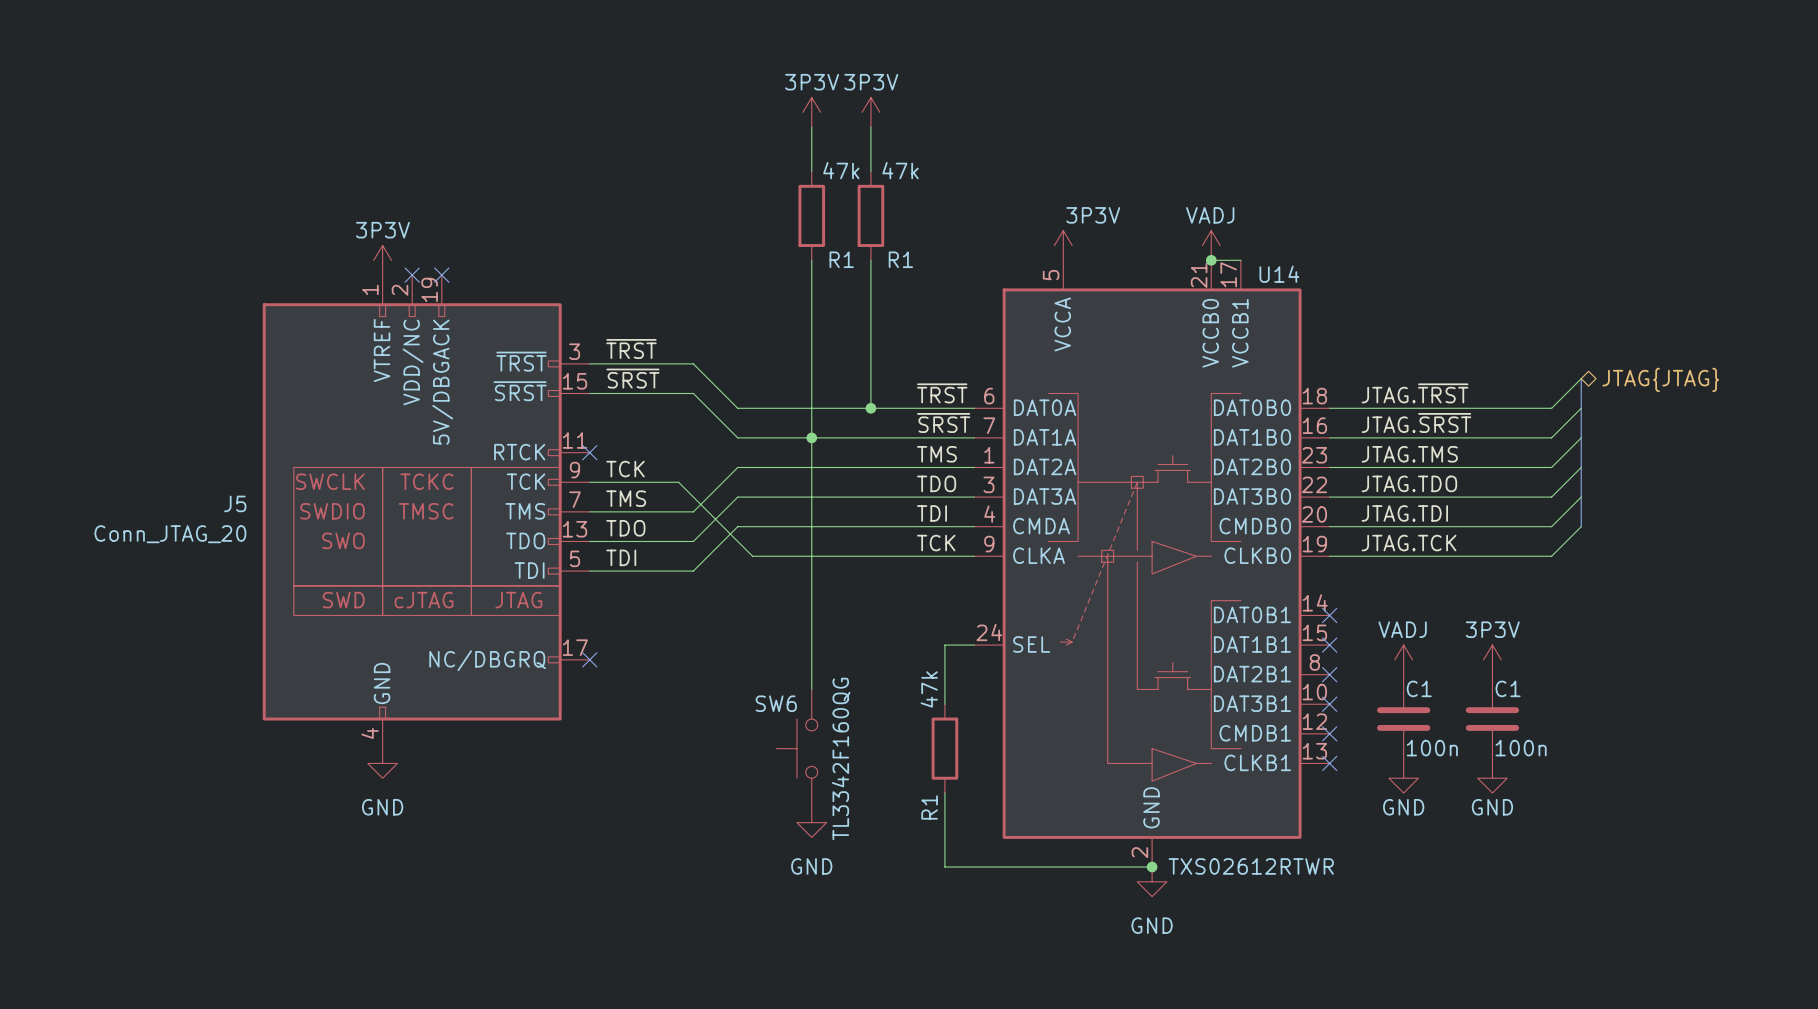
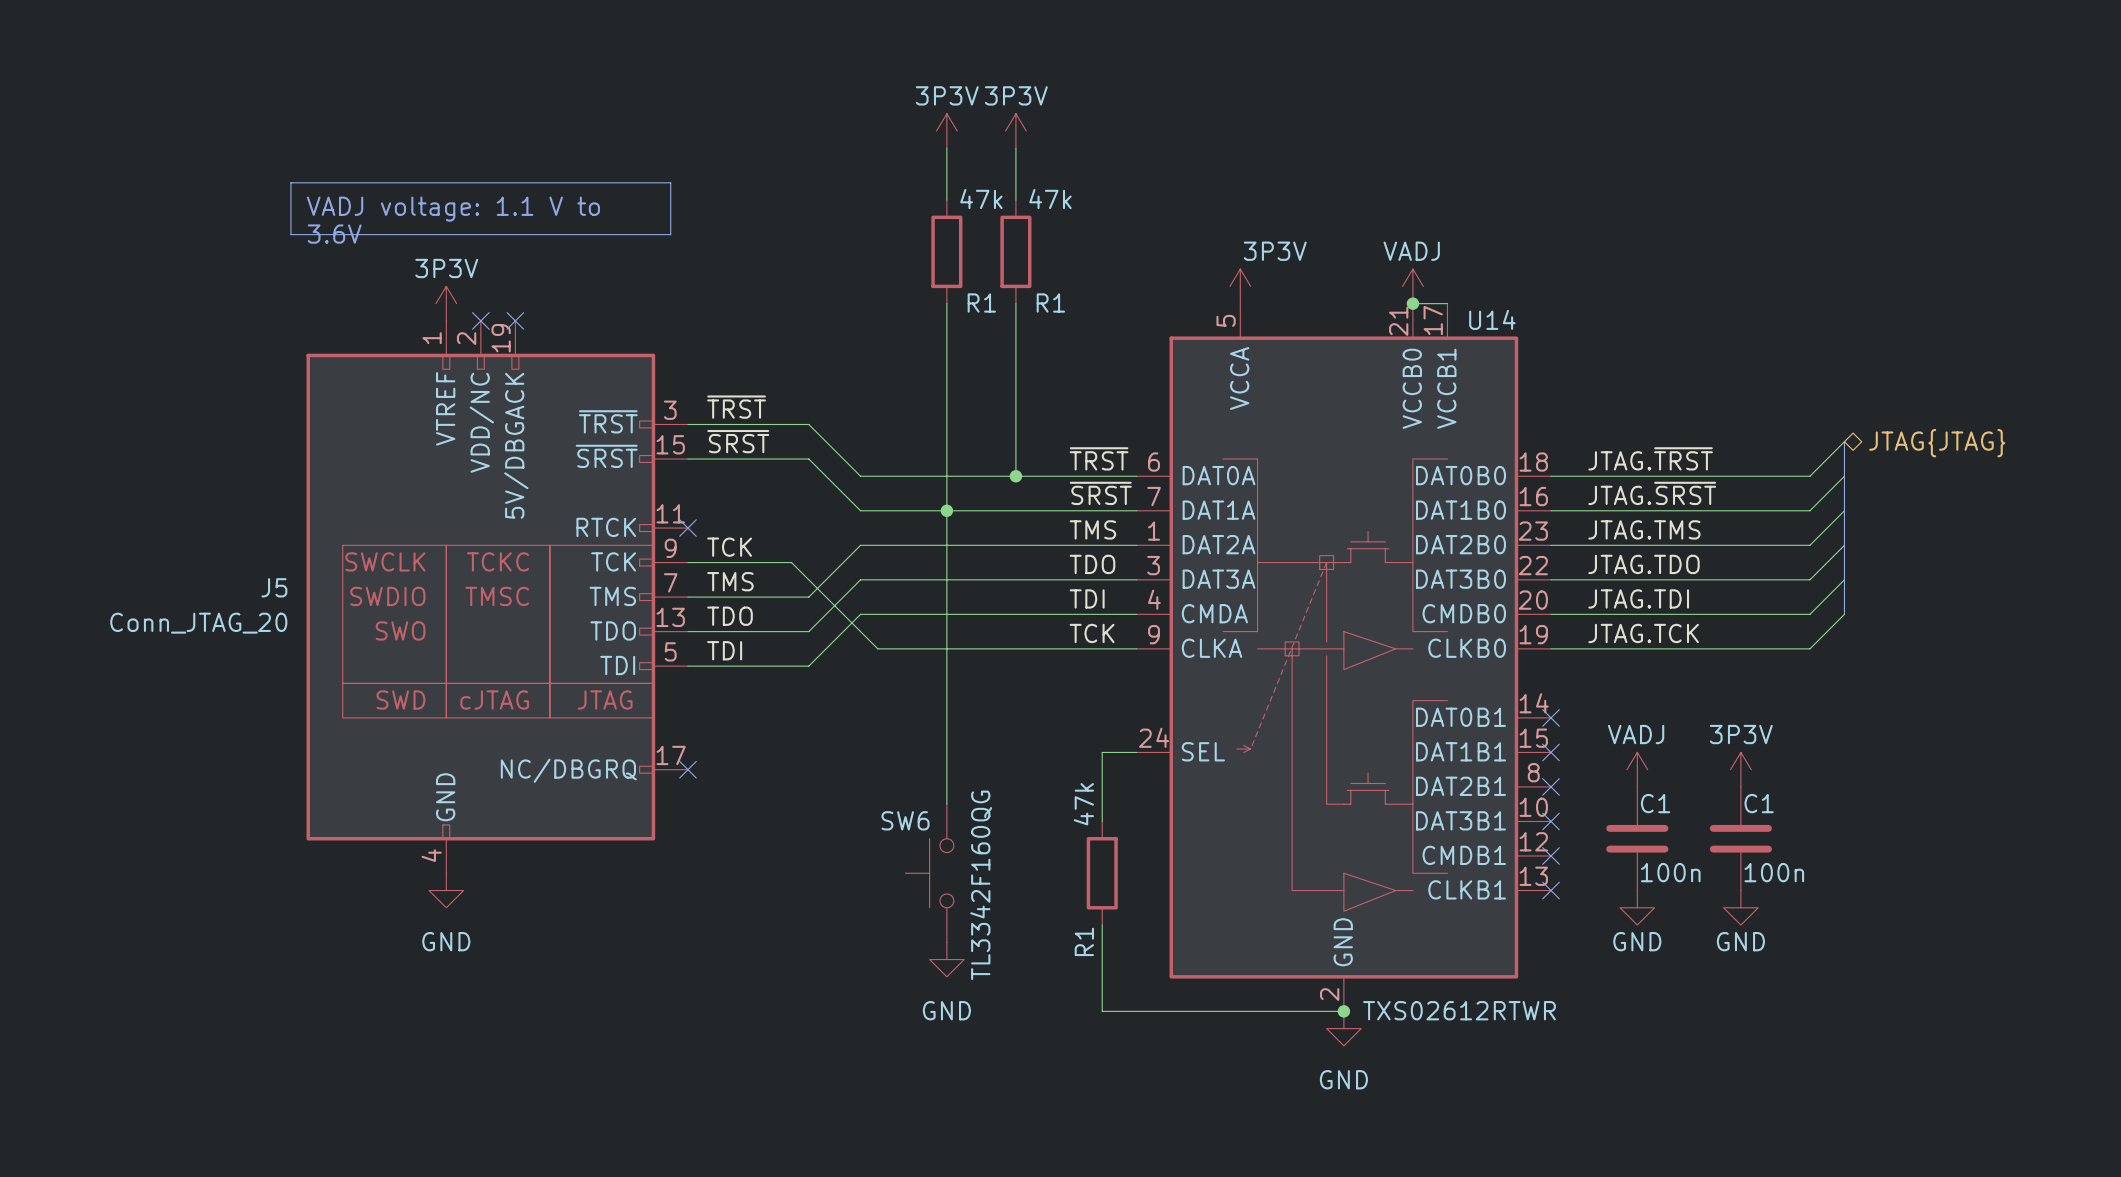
line: none -> (290, 182) (670, 182) (670, 234) (290, 234) (290, 182)
text: none -> VADJ voltage: 1.1 V to (453, 209)
text: none -> 3.6V (334, 234)

